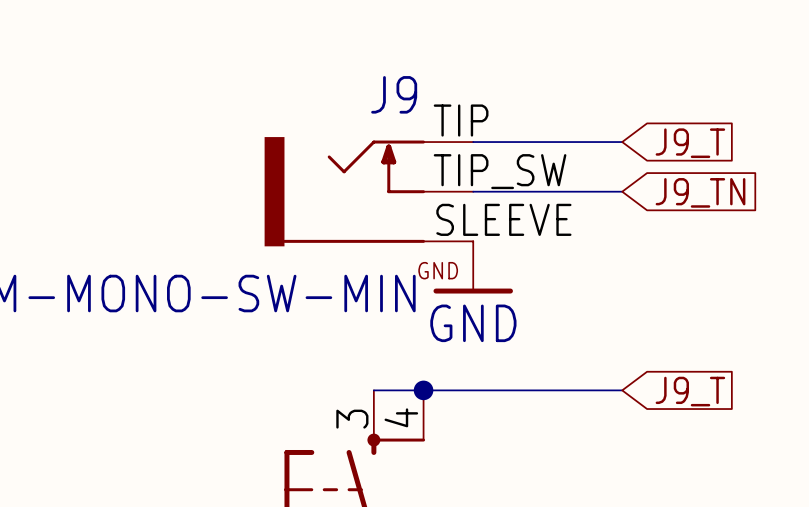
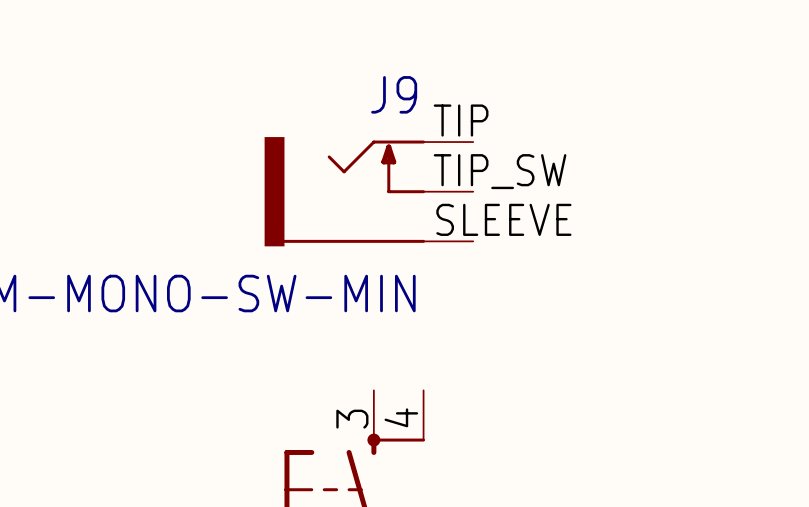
wire: (473, 142) (622, 142) -> none
global label: J9_T (690, 143) -> none
wire: (473, 191) (622, 191) -> none
global label: J9_TN (700, 192) -> none
power symbol: GND (473, 267) -> none
wire: (373, 390) (622, 390) -> none
junction: (423, 390) -> none
global label: J9_T (690, 391) -> none

